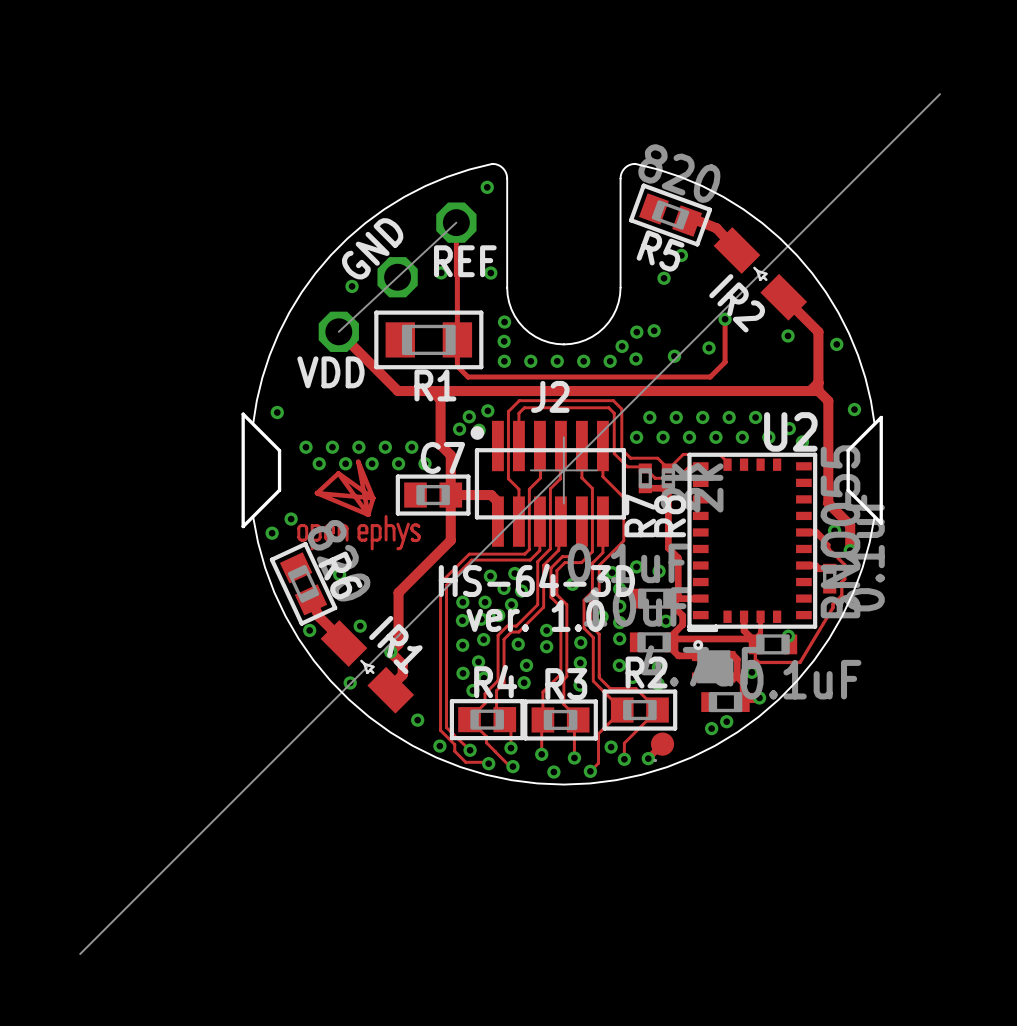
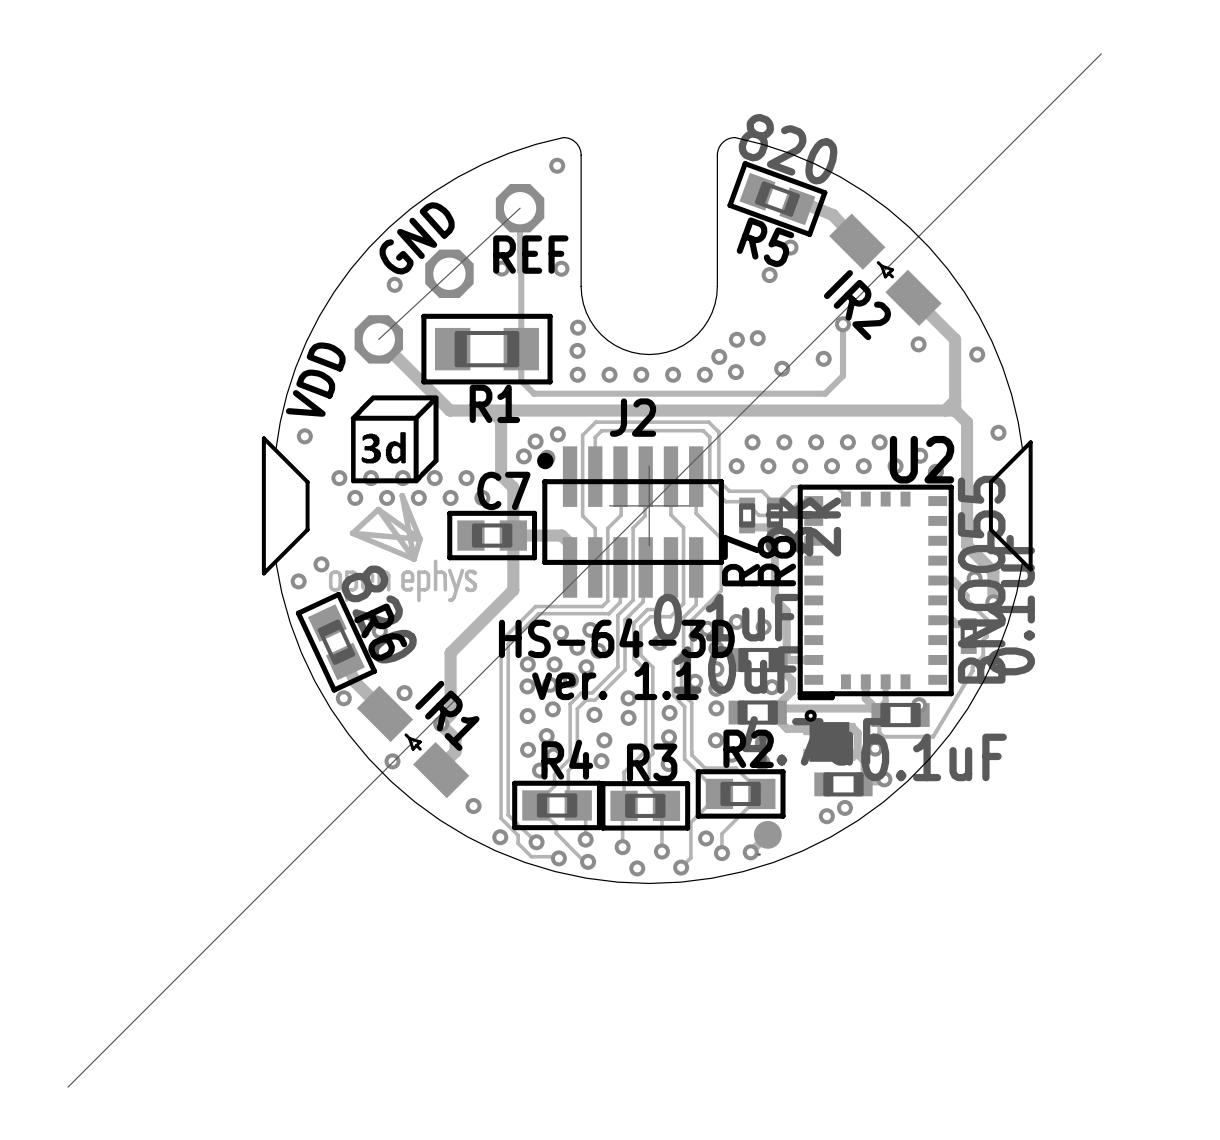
GND name rotation: 0° (372, 248) -> 3° clockwise (417, 238)
VDD name rotation: 0° (330, 372) -> 69° counterclockwise (315, 379)
drawing: none -> [350, 395, 439, 484]
text: ver. 1.0 (535, 615) -> ver. 1.1 (615, 680)

